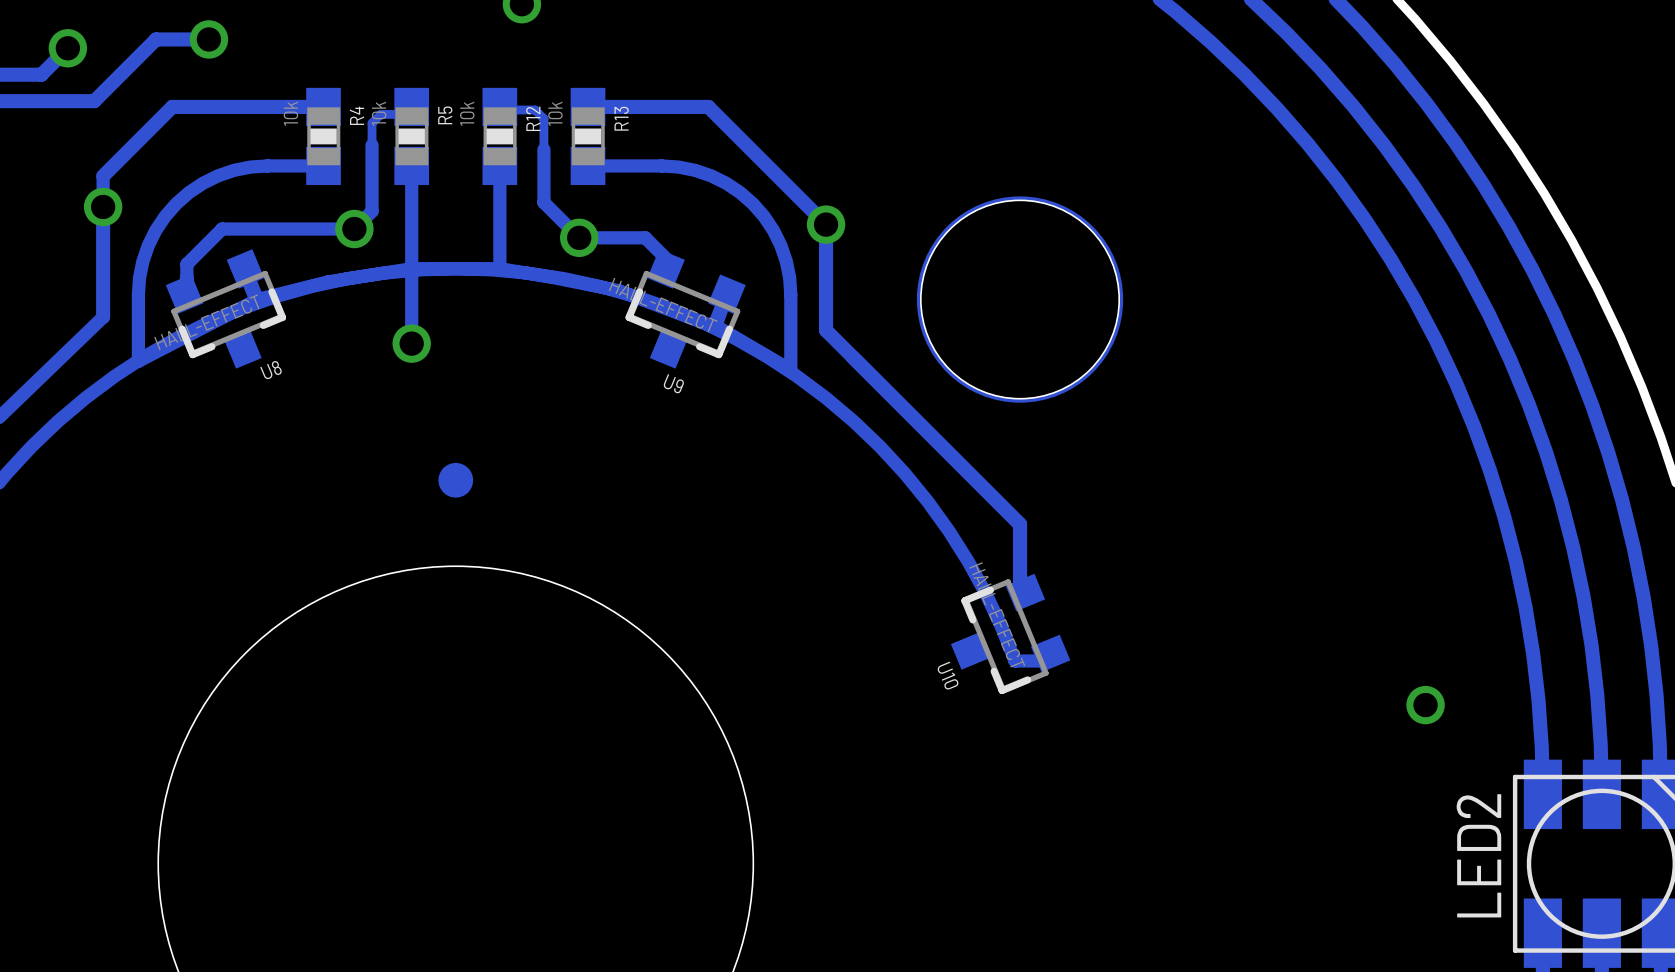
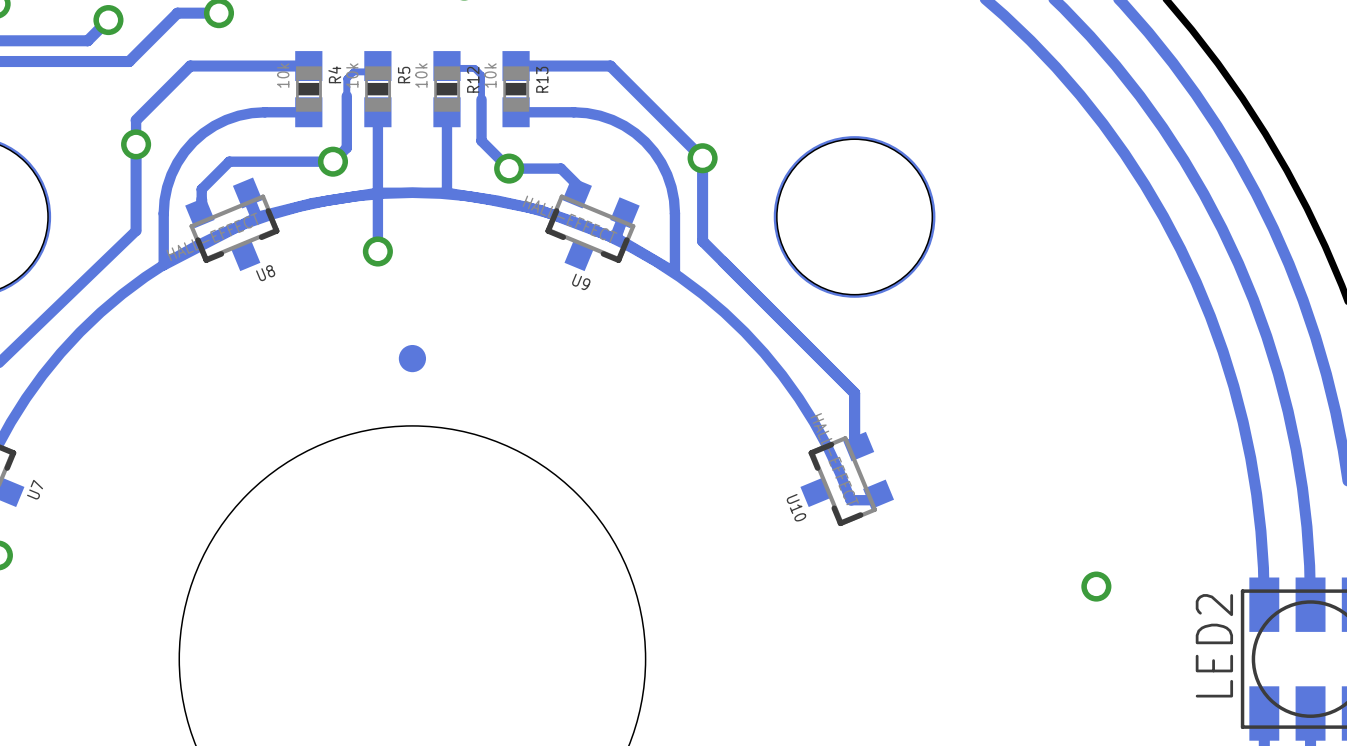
via position: (1425, 705) -> (1096, 586)

